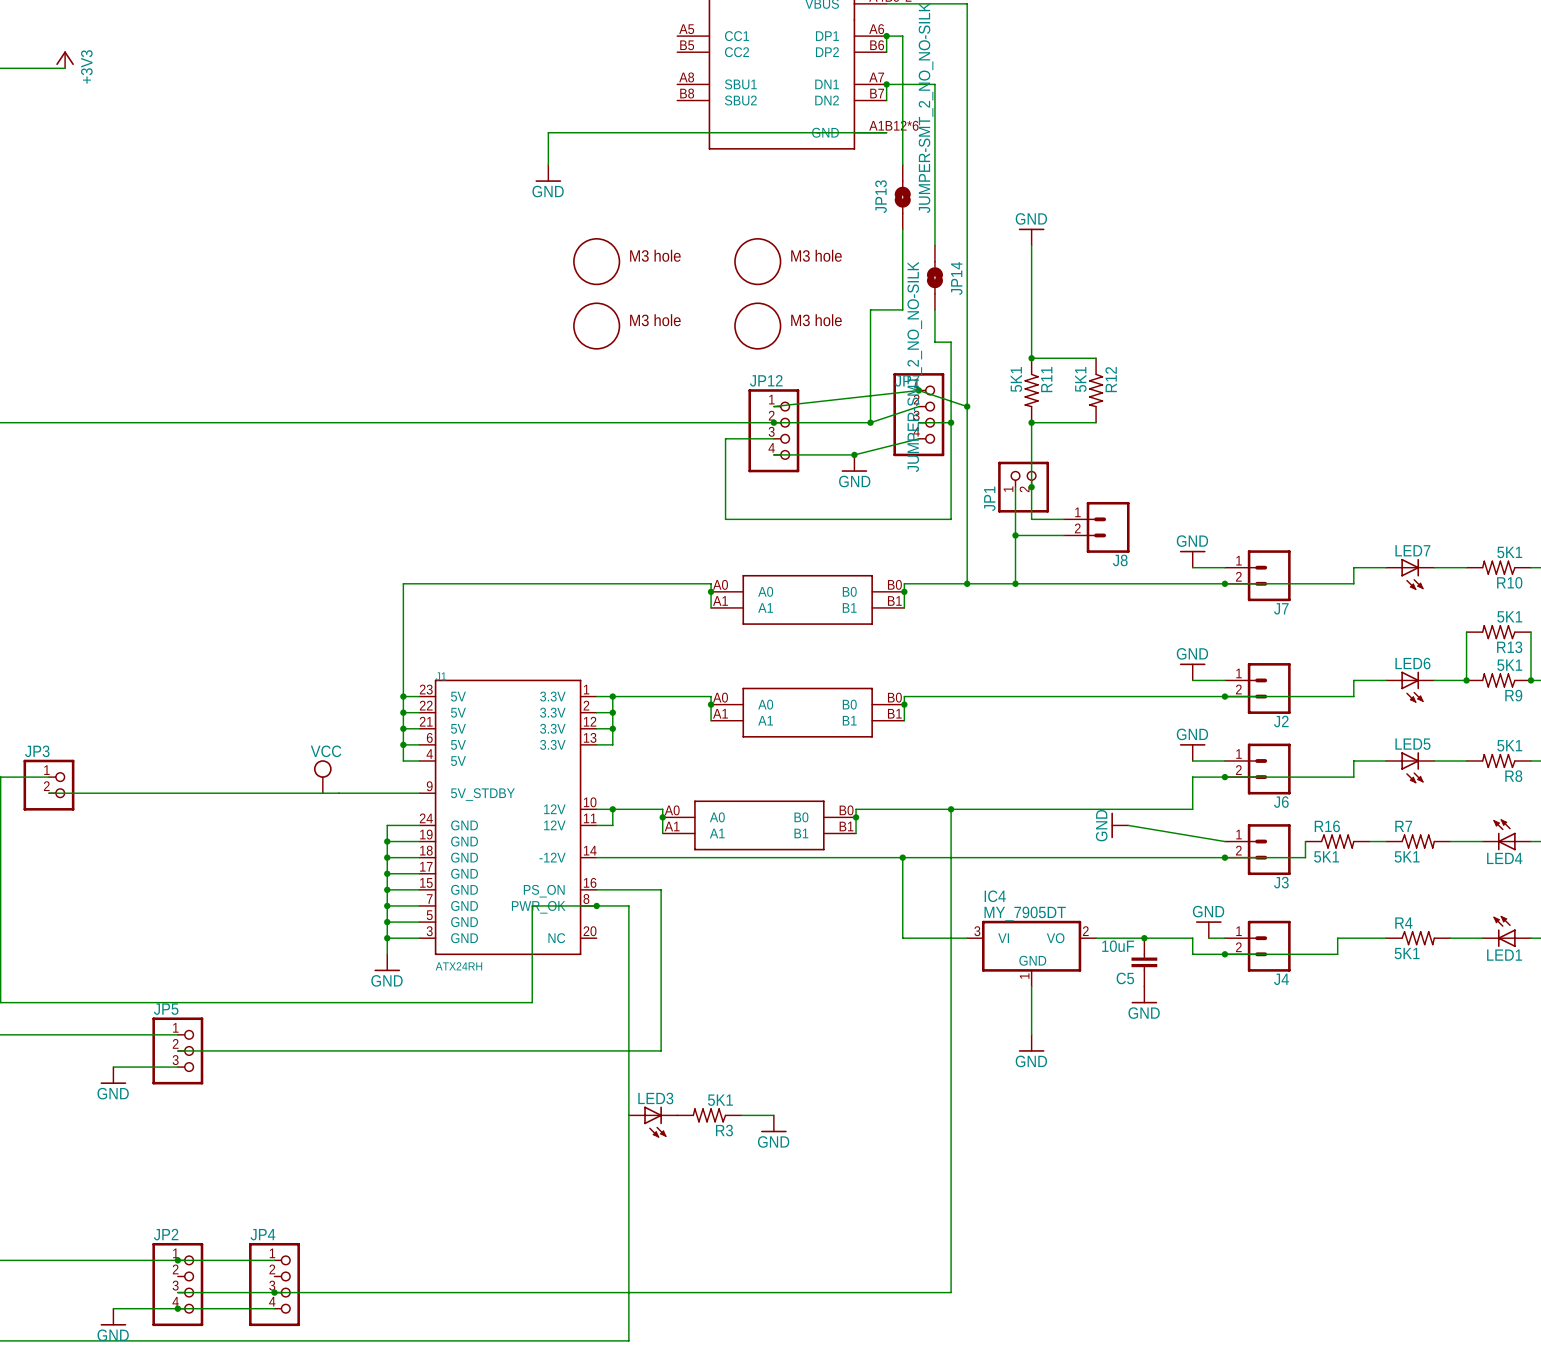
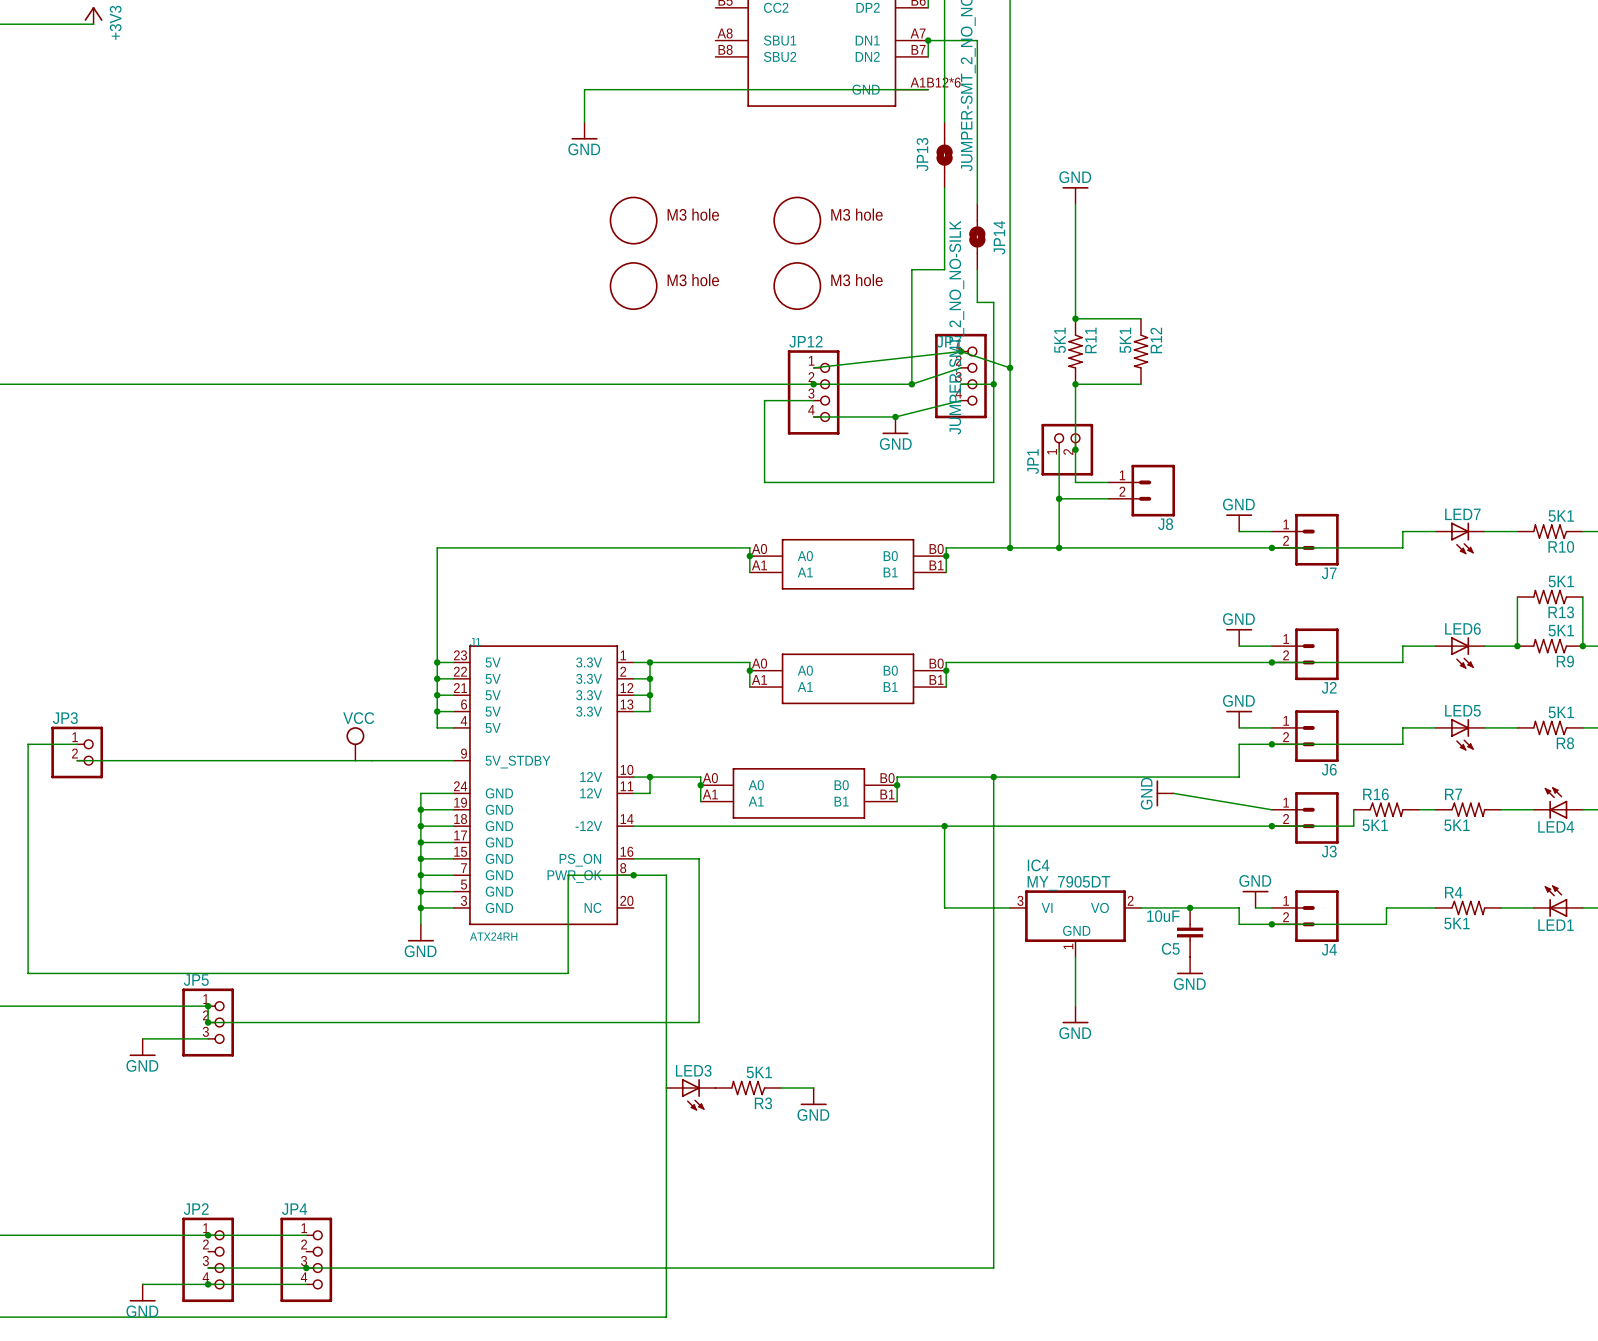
wire: none -> (208, 1006) (208, 1022)
junction: none -> (208, 1006)
junction: none -> (208, 1022)

